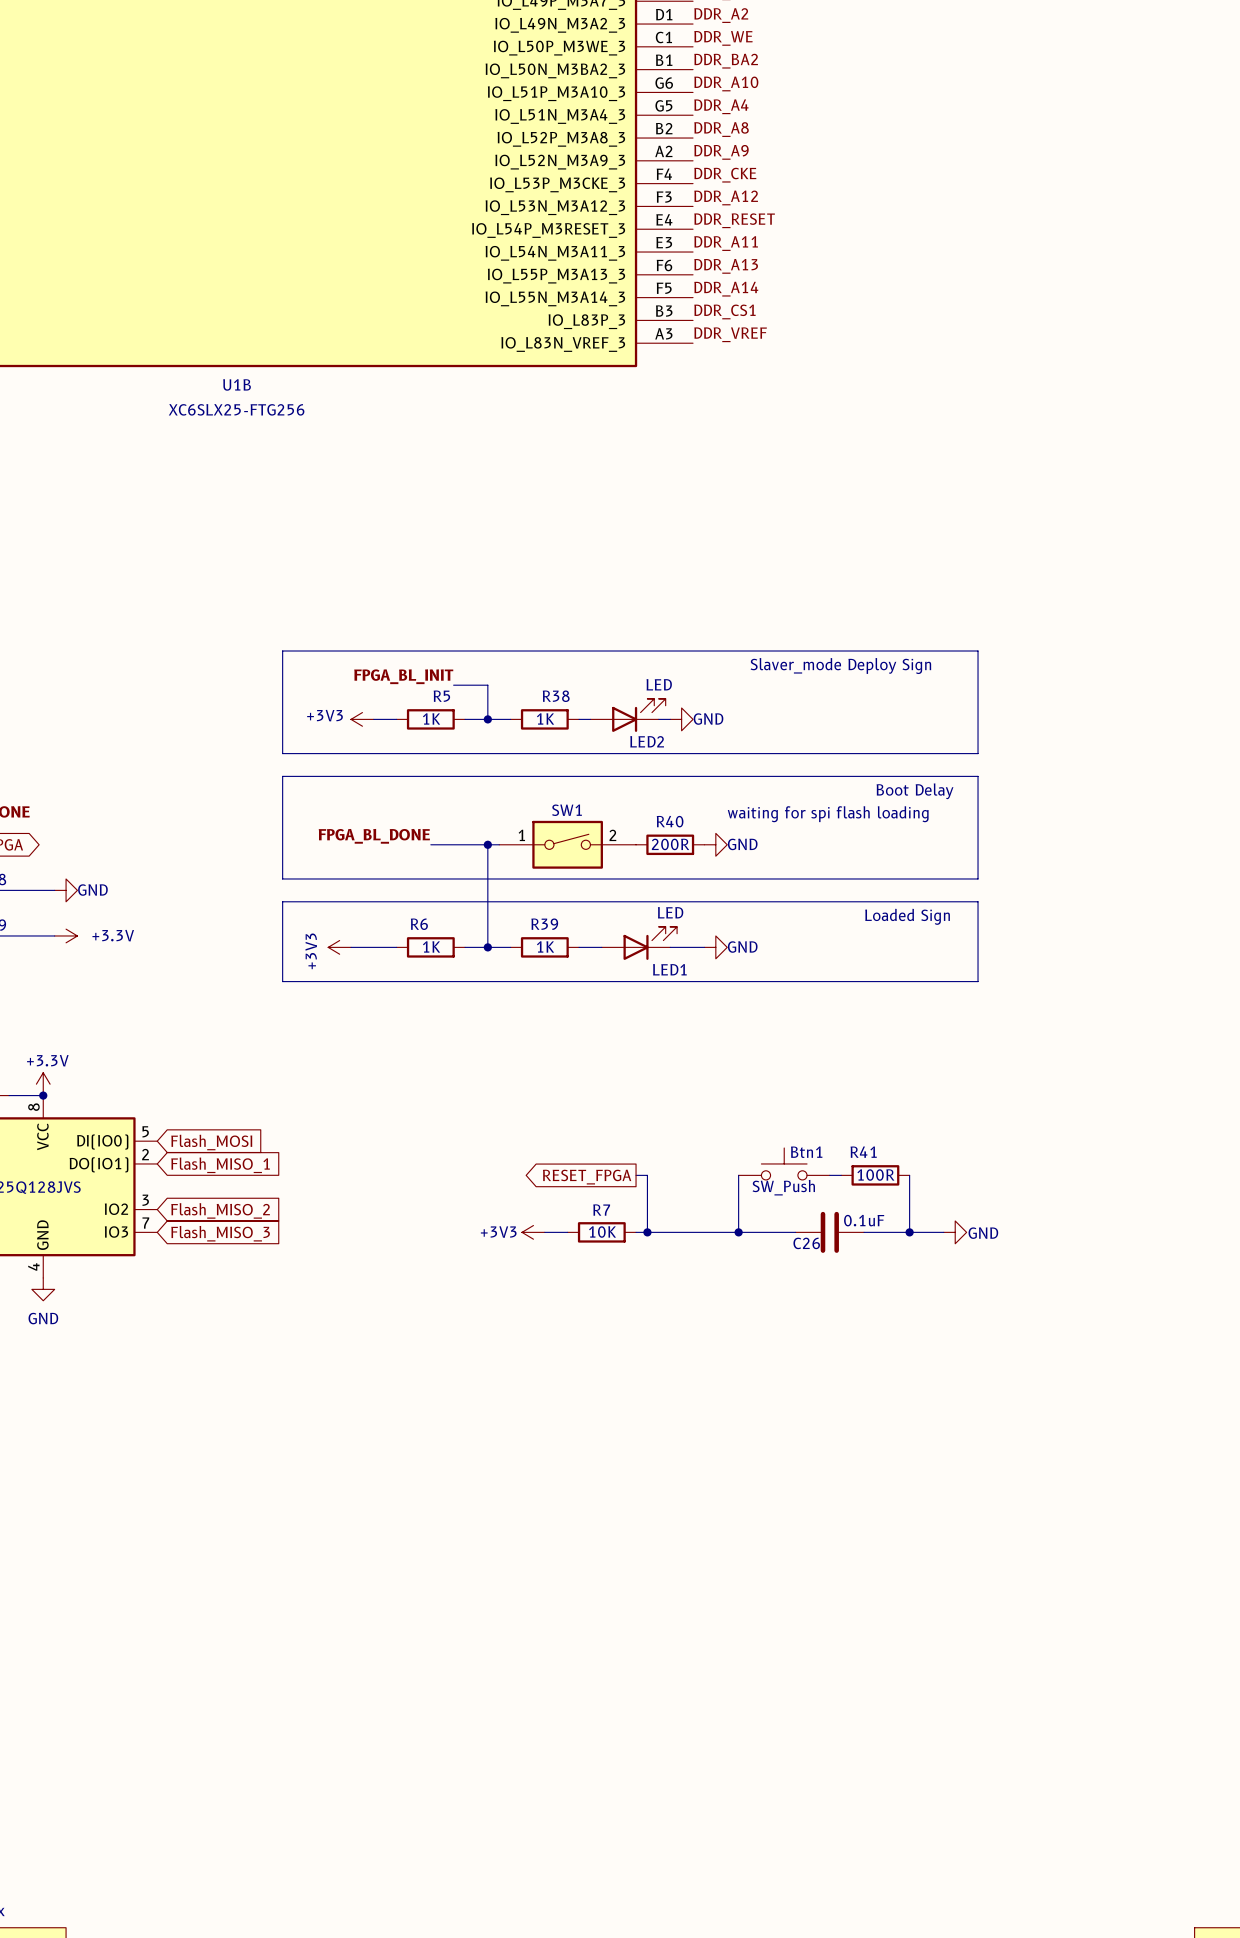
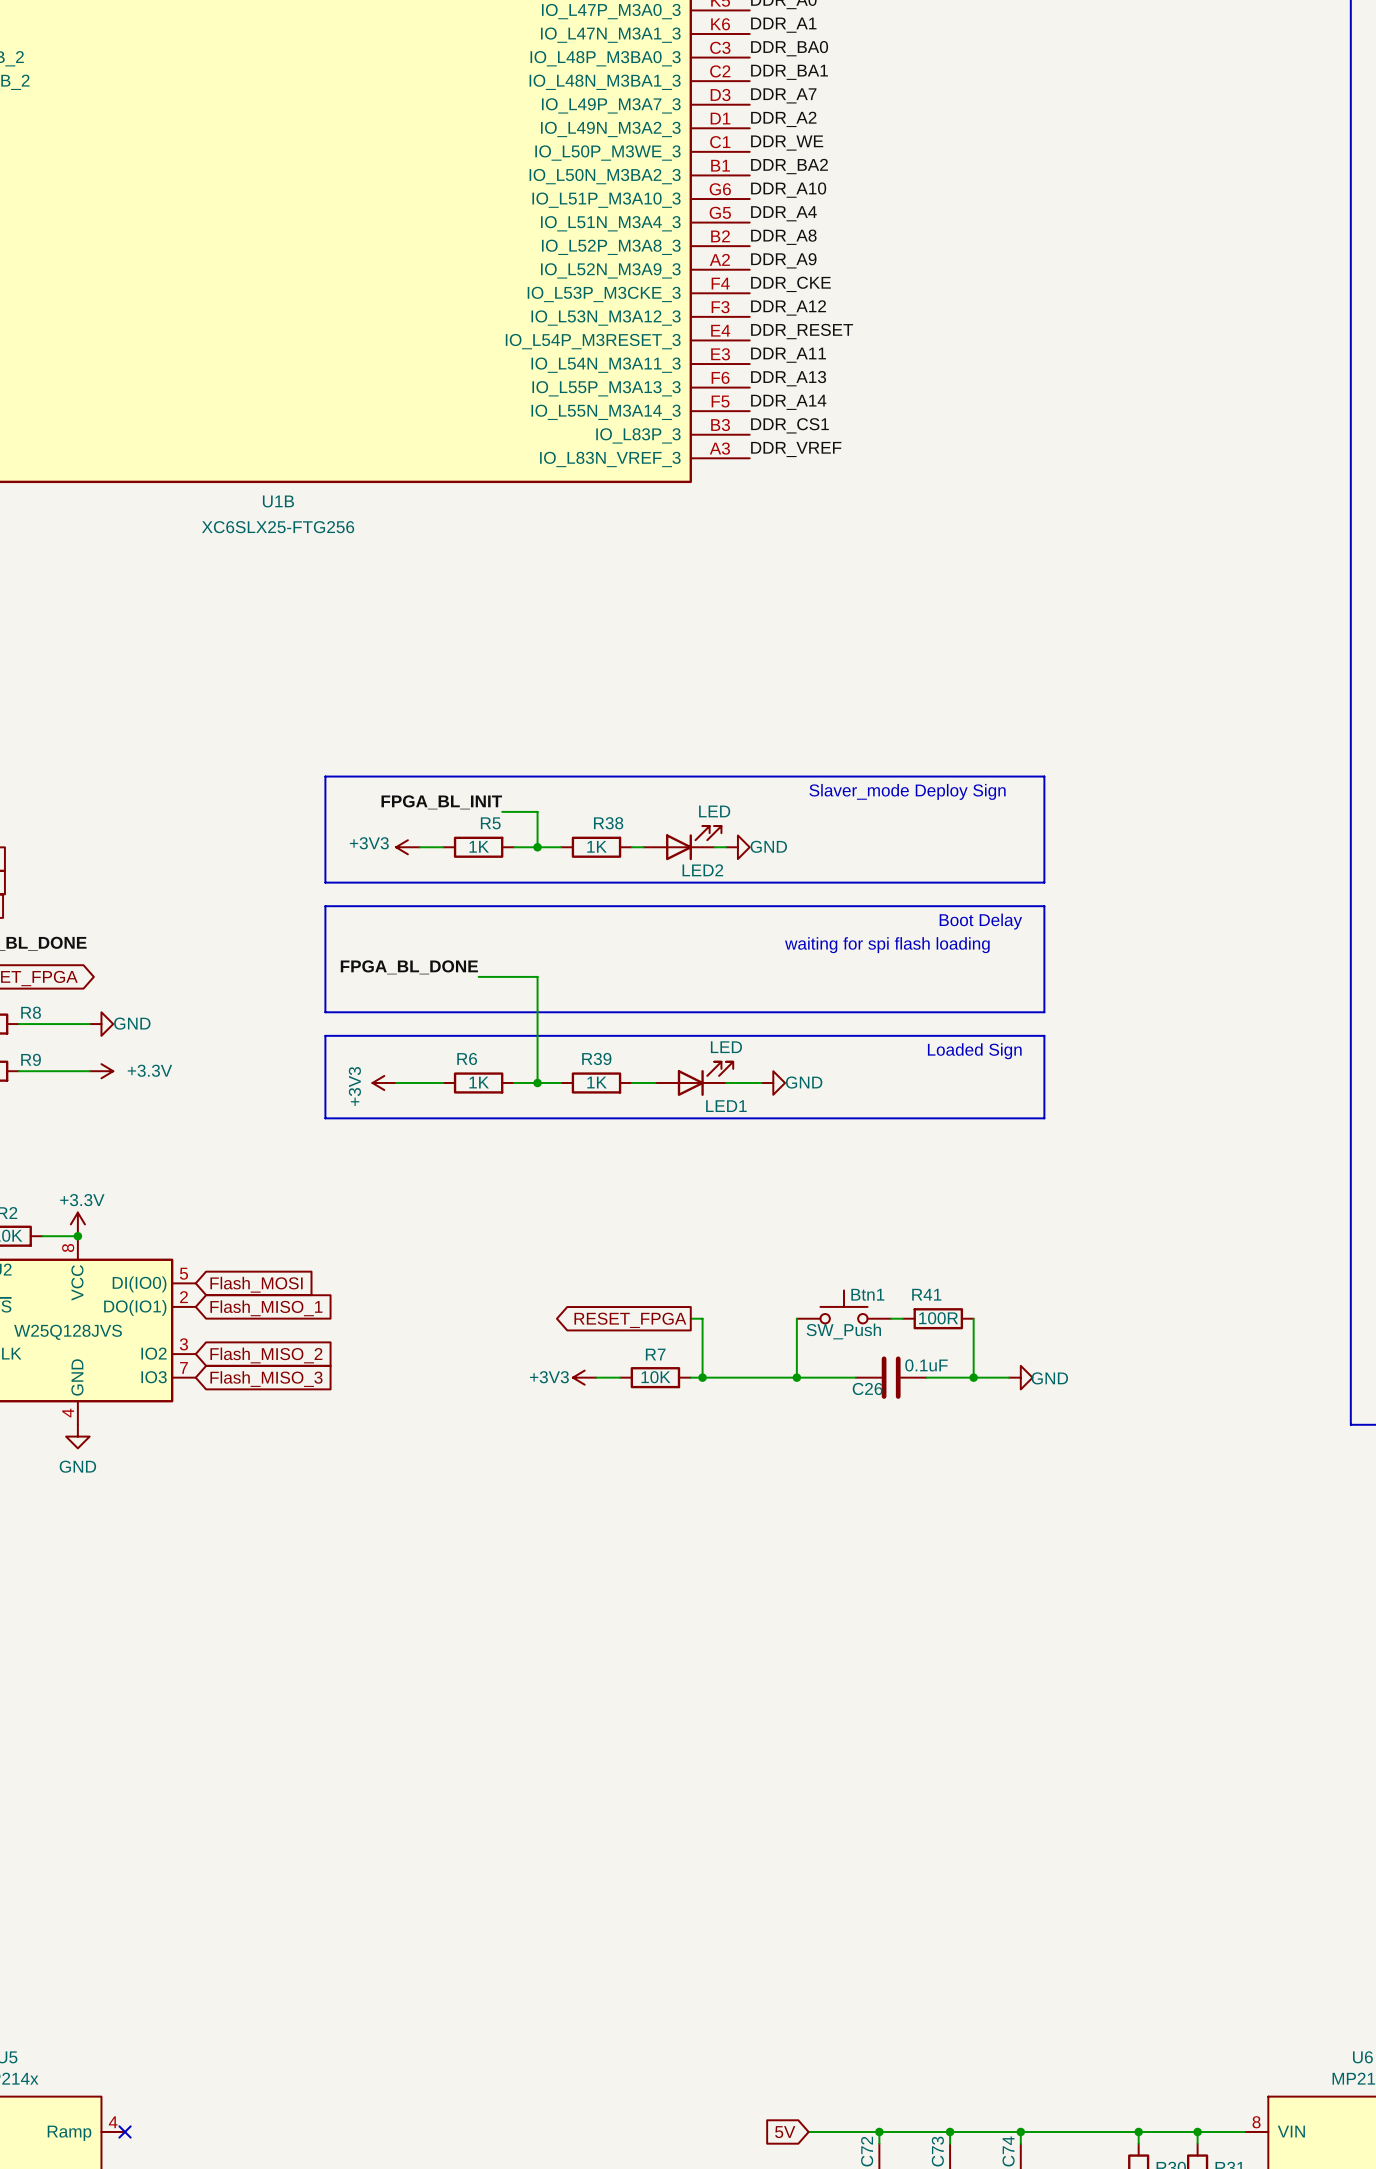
wire: (487, 844) (499, 844) -> none
junction: (487, 844) -> none
SW1: (567, 844) -> none
R40: 200R (670, 844) -> none
power symbol: GND (715, 844) -> none

